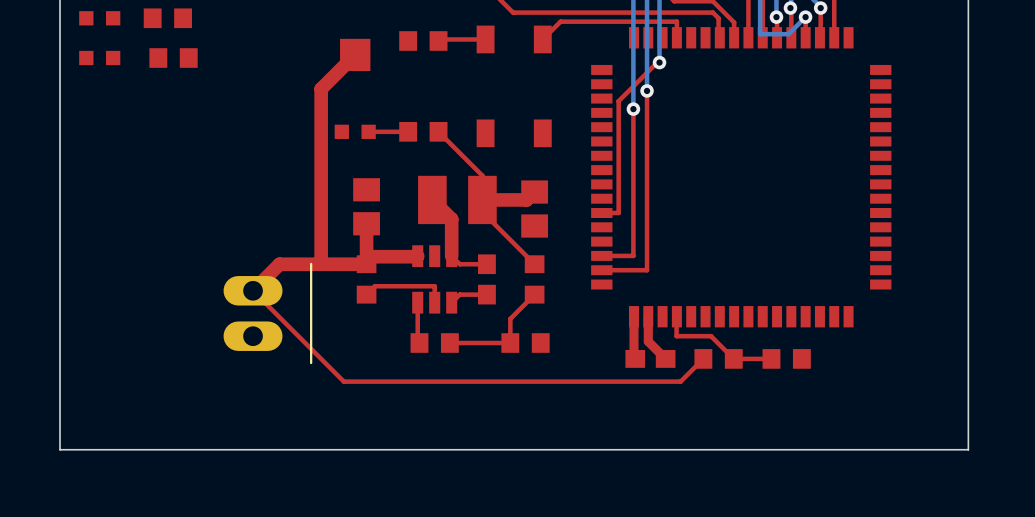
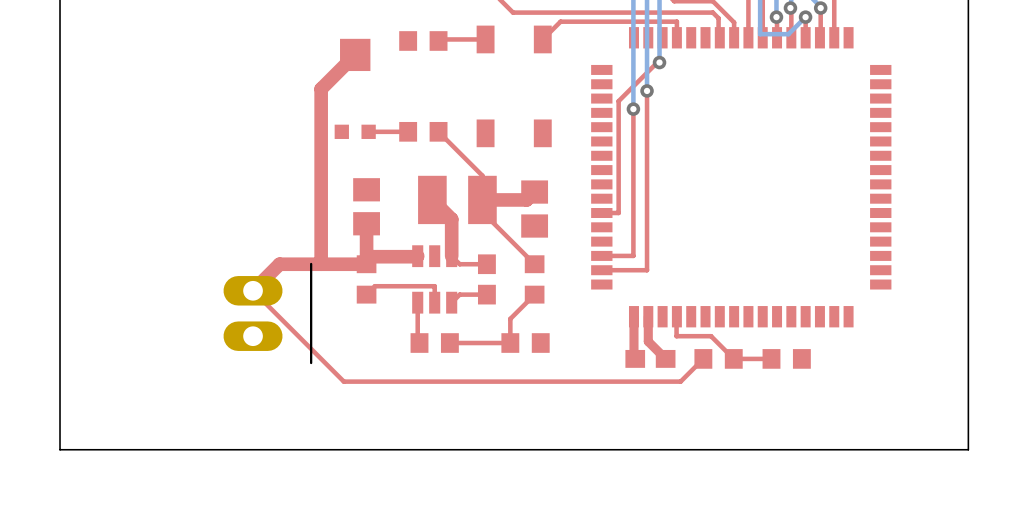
part: (99, 18) -> none
part: (167, 18) -> none
part: (99, 58) -> none
part: (173, 58) -> none

